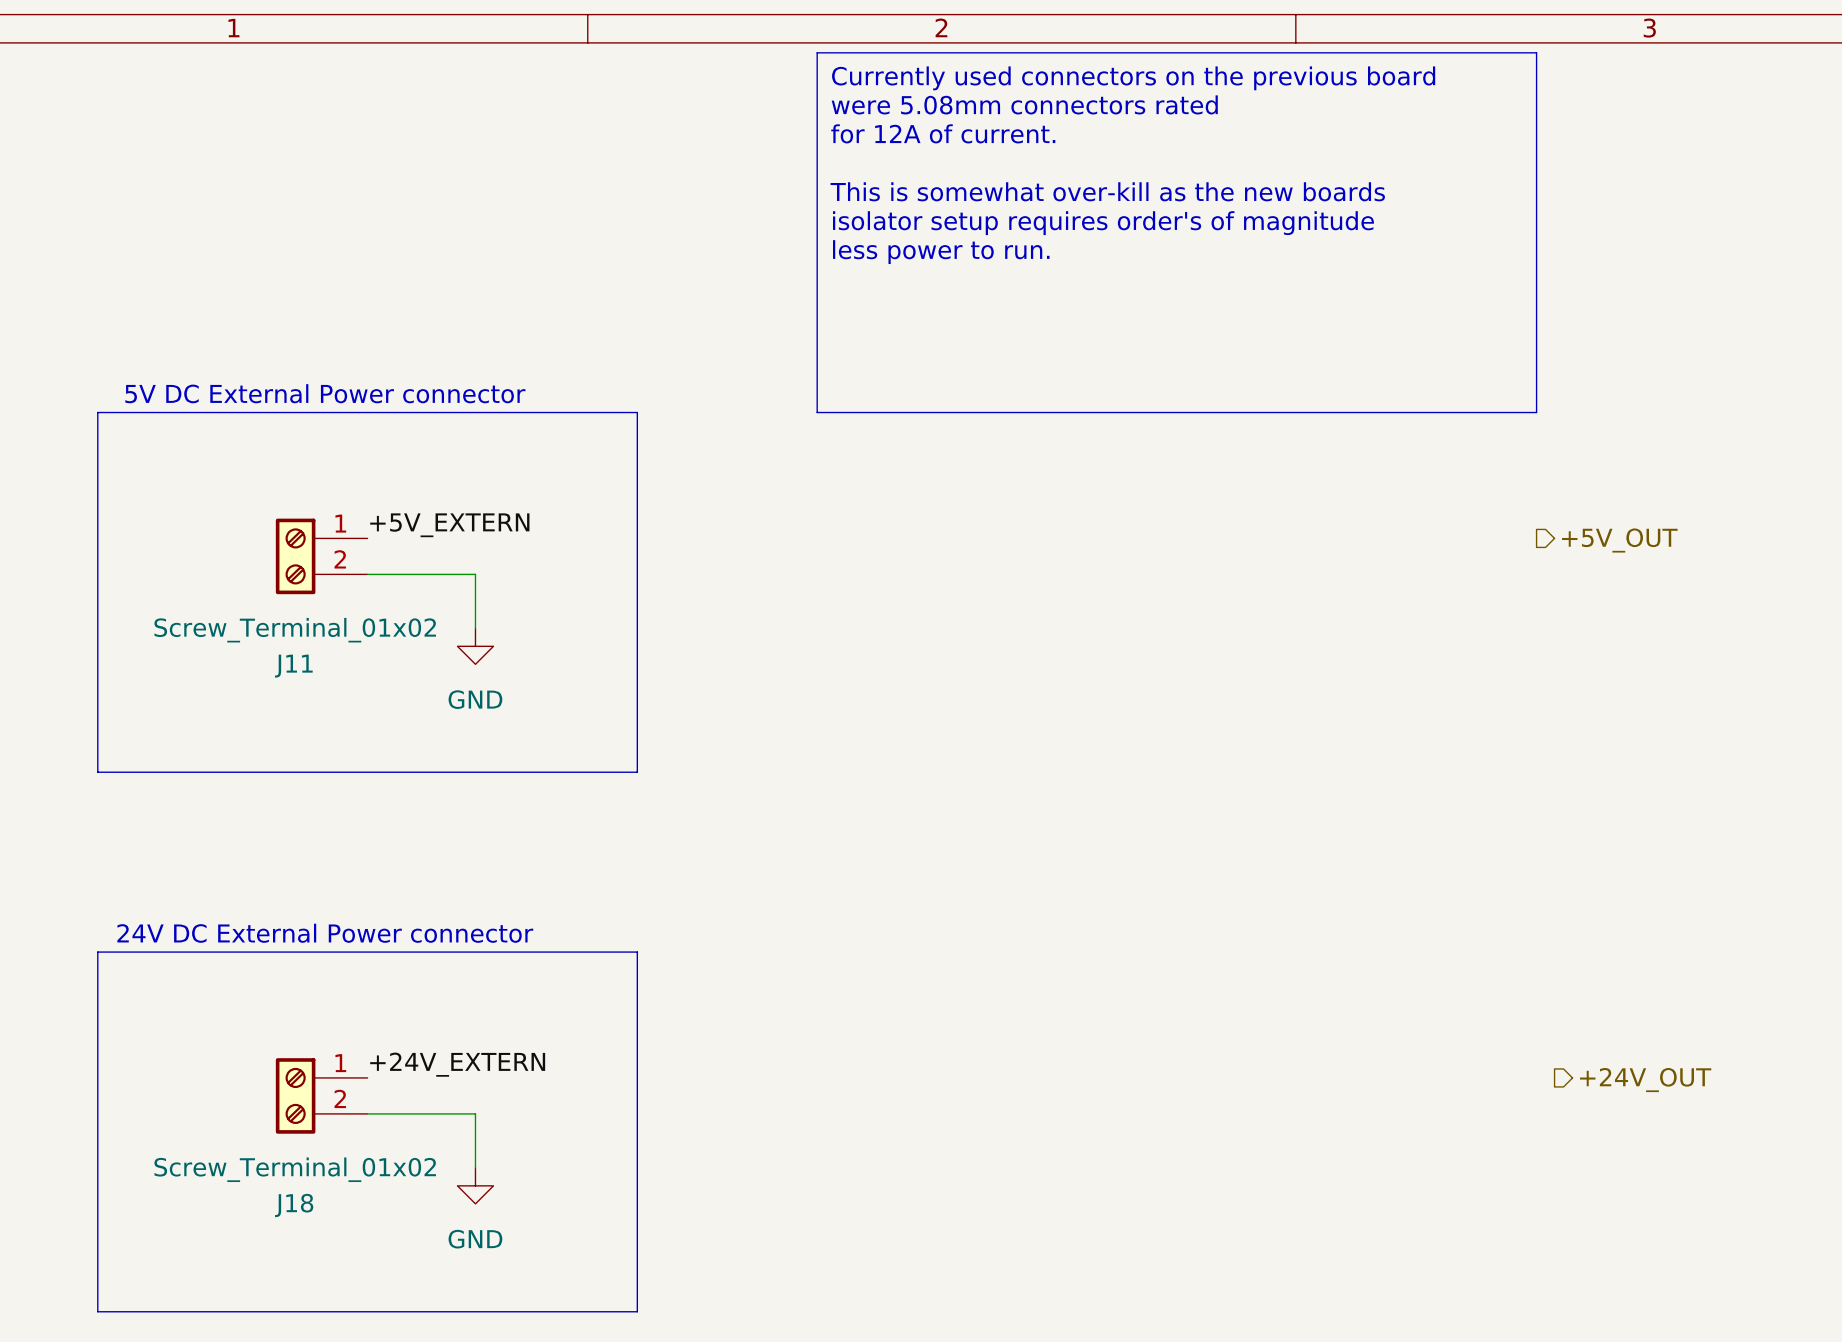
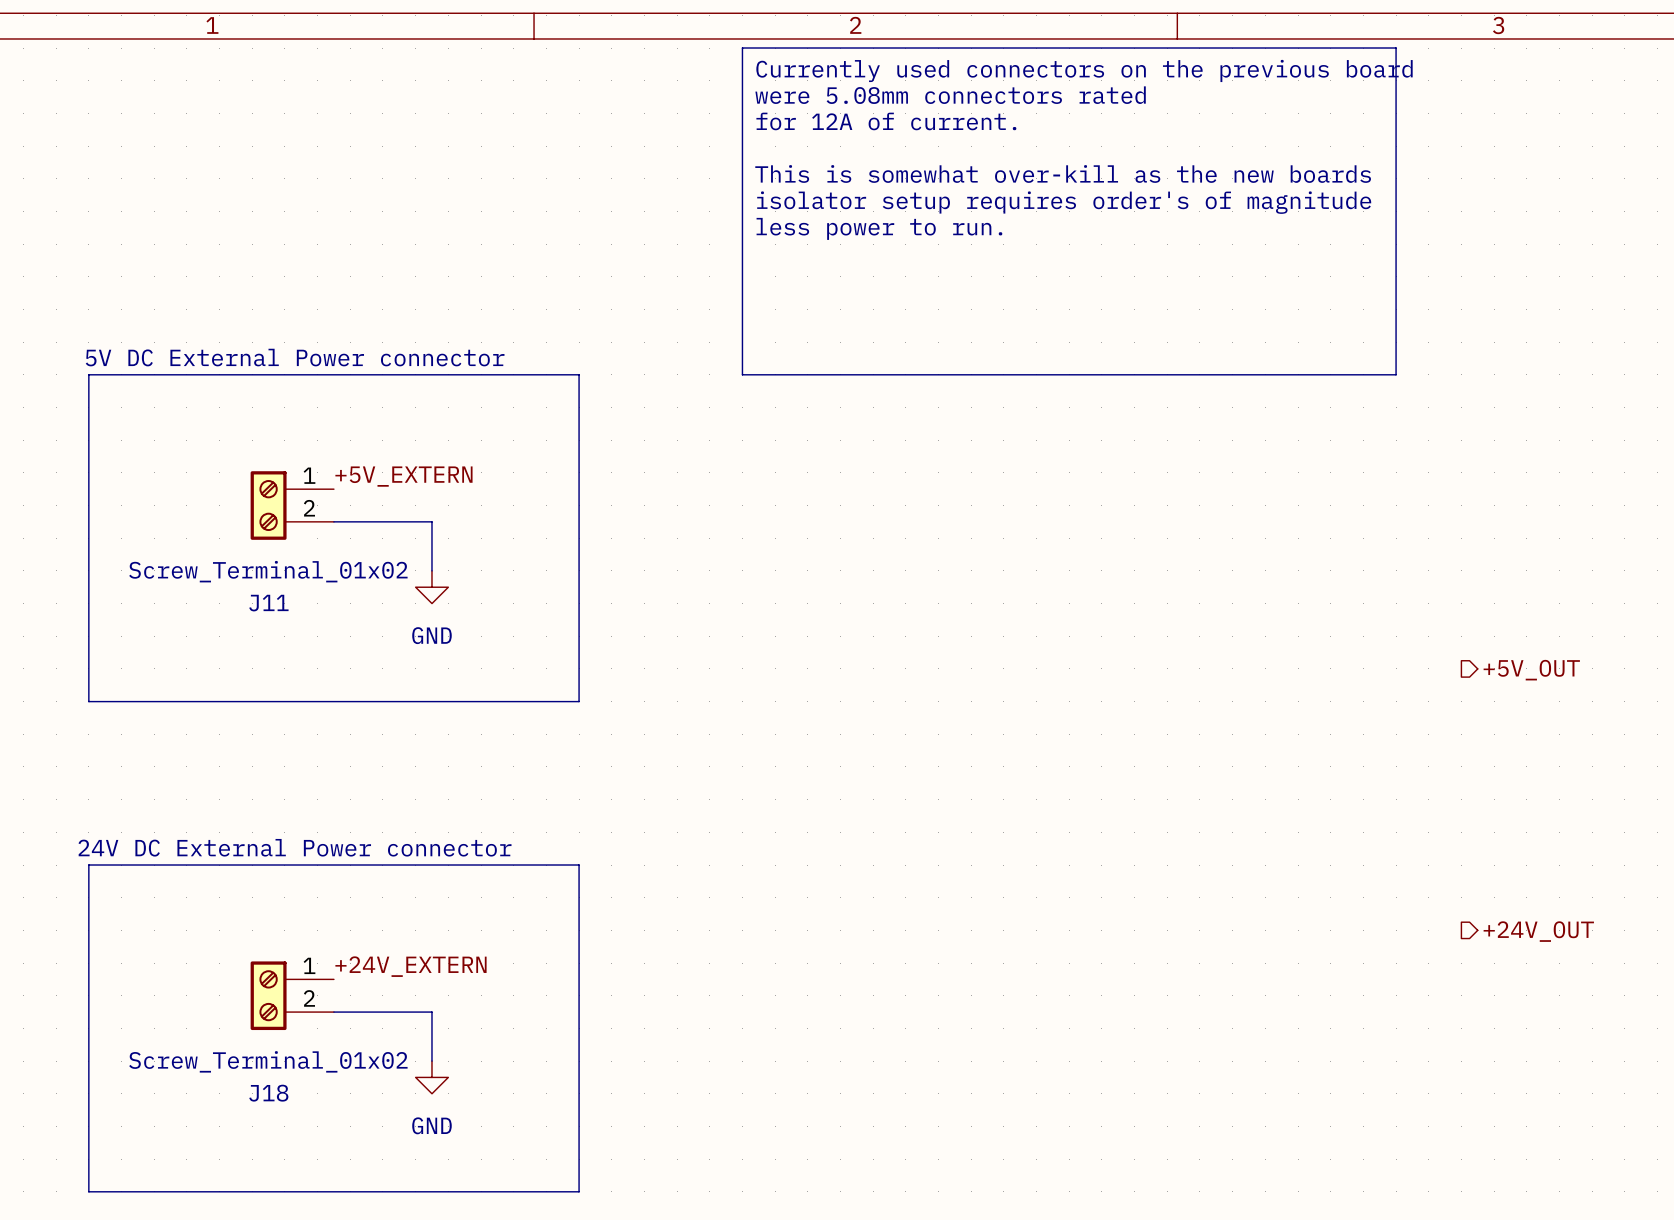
hierarchical label position: +5V_OUT (1619, 540) -> +5V_OUT (1531, 670)
hierarchical label position: +24V_OUT (1645, 1080) -> +24V_OUT (1538, 931)

